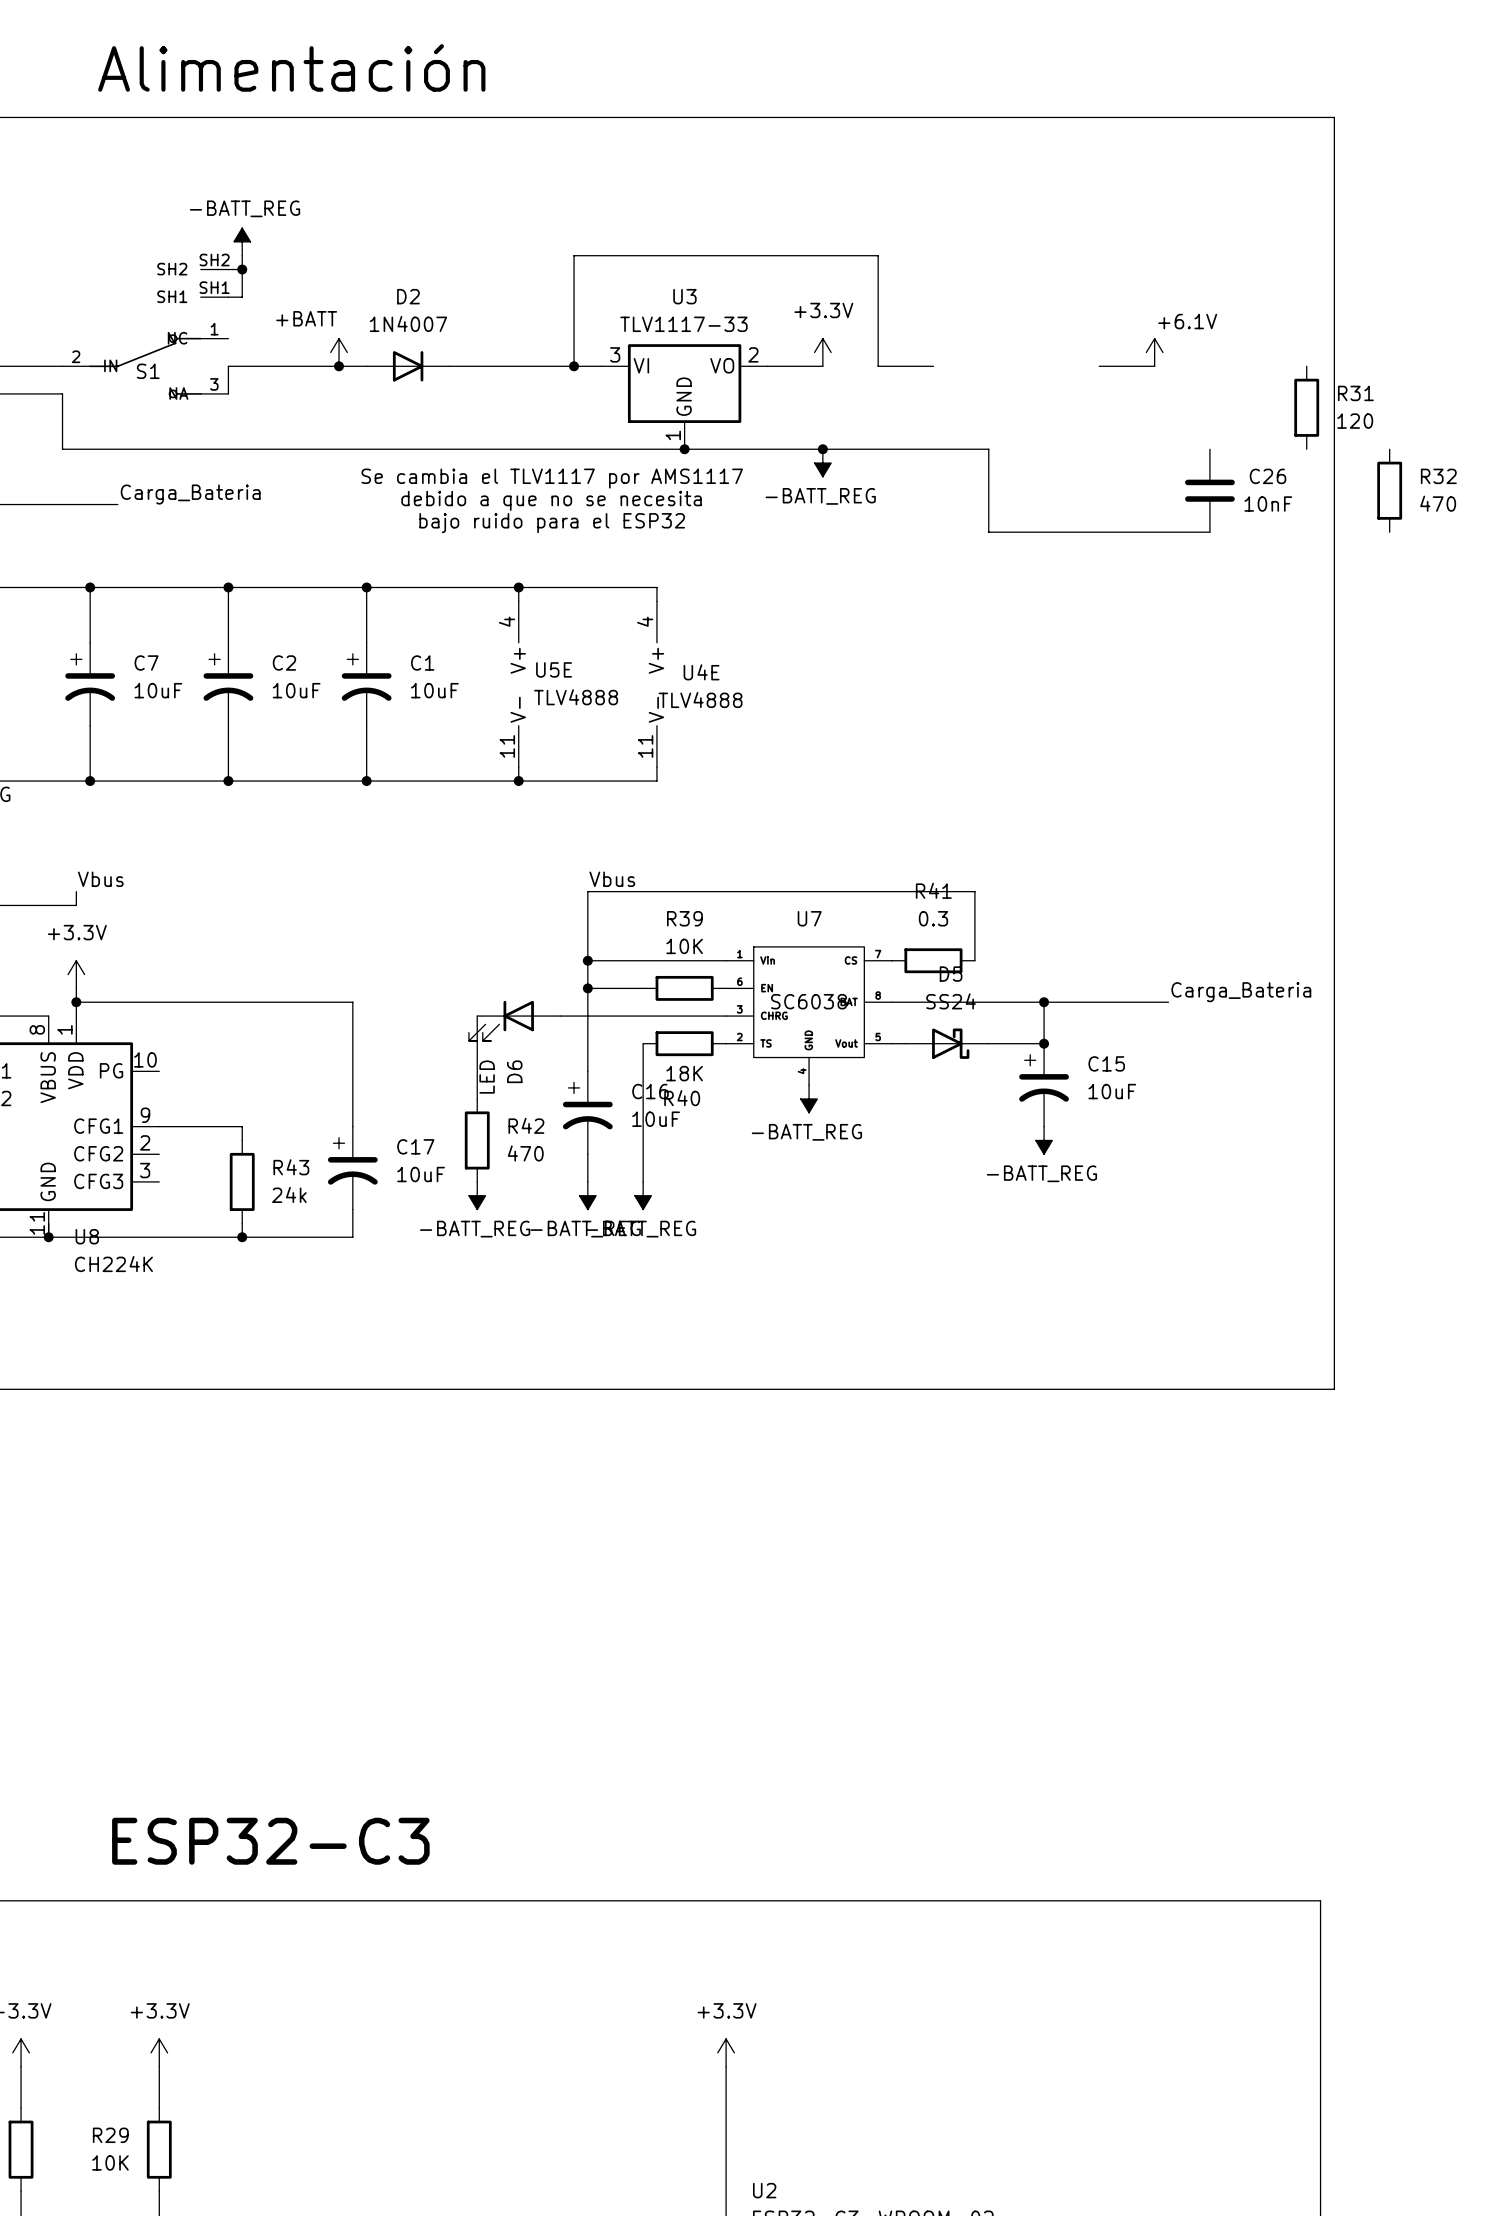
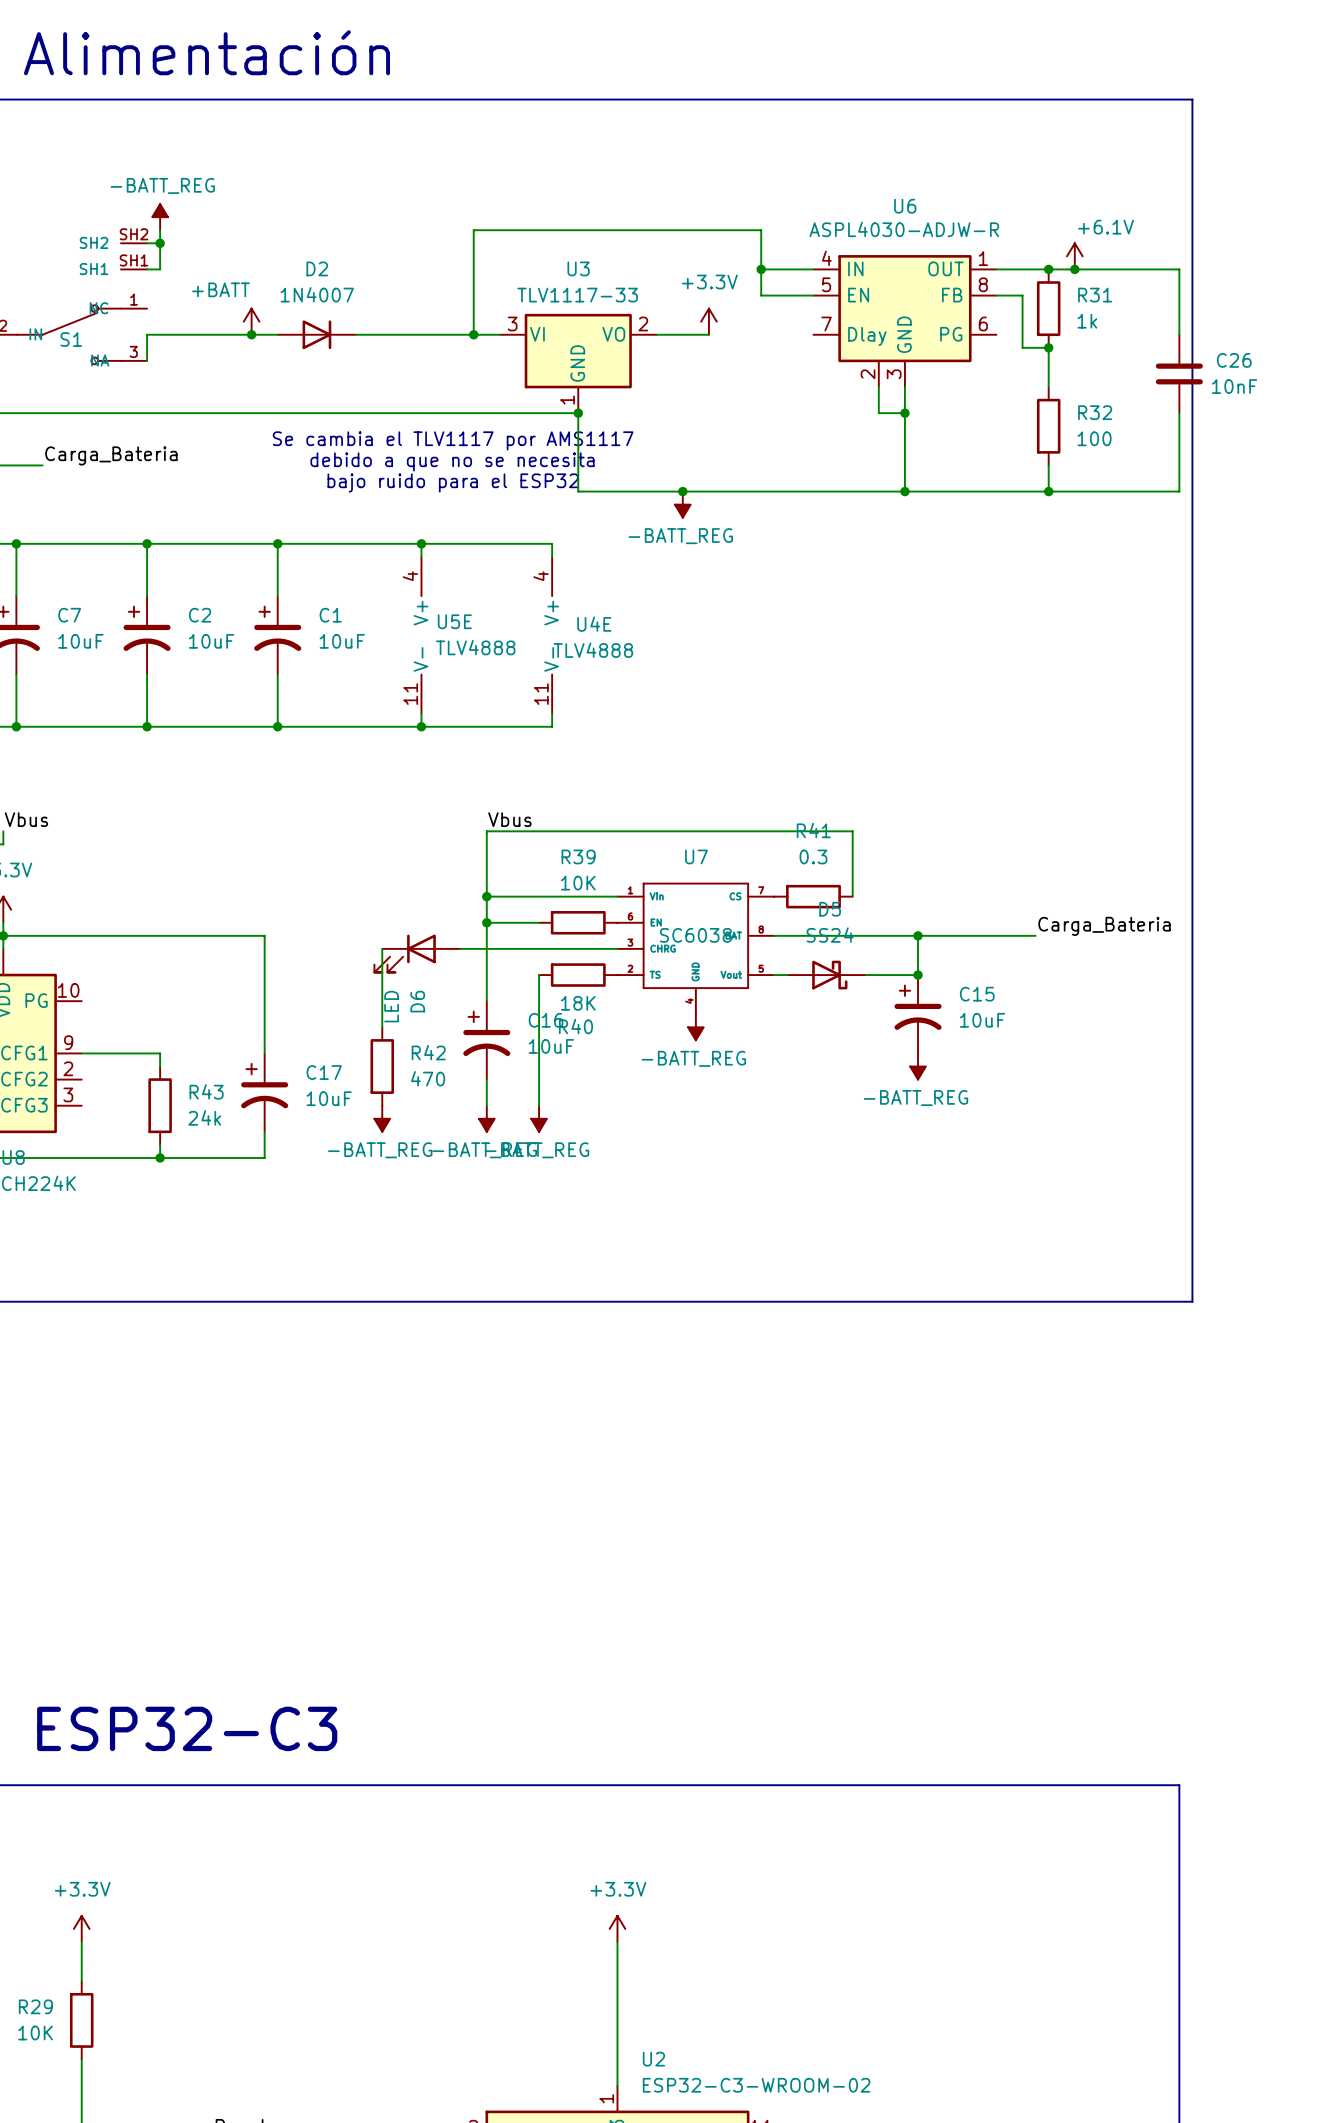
junction: none -> (761, 269)
wire: none -> (996, 269) (1179, 269) (1179, 334)
junction: none -> (1048, 269)
junction: none -> (1074, 269)
wire: (878, 324) (878, 366) (933, 366) -> (761, 295) (813, 295)
wire: none -> (996, 295) (1022, 295) (1022, 347) (1048, 347) (1048, 387)
U6: none -> ASPL4030-ADJW-R (904, 321)
power symbol position: +6.1V (1154, 352) -> +6.1V (1074, 256)
wire: (1099, 366) (1154, 366) -> (761, 269) (813, 269)
junction: none -> (1048, 347)
R31 position: (1306, 407) -> (1048, 308)
wire: none -> (878, 387) (878, 413) (904, 413)
wire: none -> (904, 387) (904, 491)
R31 value: 120 (1355, 421) -> 1k (1087, 321)
wire: (684, 449) (988, 449) (988, 532) -> (578, 413) (578, 491) (865, 491)
junction: (822, 449) -> none
junction: none -> (904, 413)
wire: none -> (1179, 413) (1179, 491) (1074, 491)
power symbol position: -BATT_REG (822, 463) -> -BATT_REG (682, 504)
C26 position: (1209, 490) -> (1179, 373)
R32 position: (1389, 490) -> (1048, 426)
R32 value: 470 (1438, 503) -> 100 (1094, 438)
wire: none -> (1048, 465) (1048, 491)
junction: none -> (682, 491)
junction: none -> (904, 491)
junction: none -> (1048, 491)

